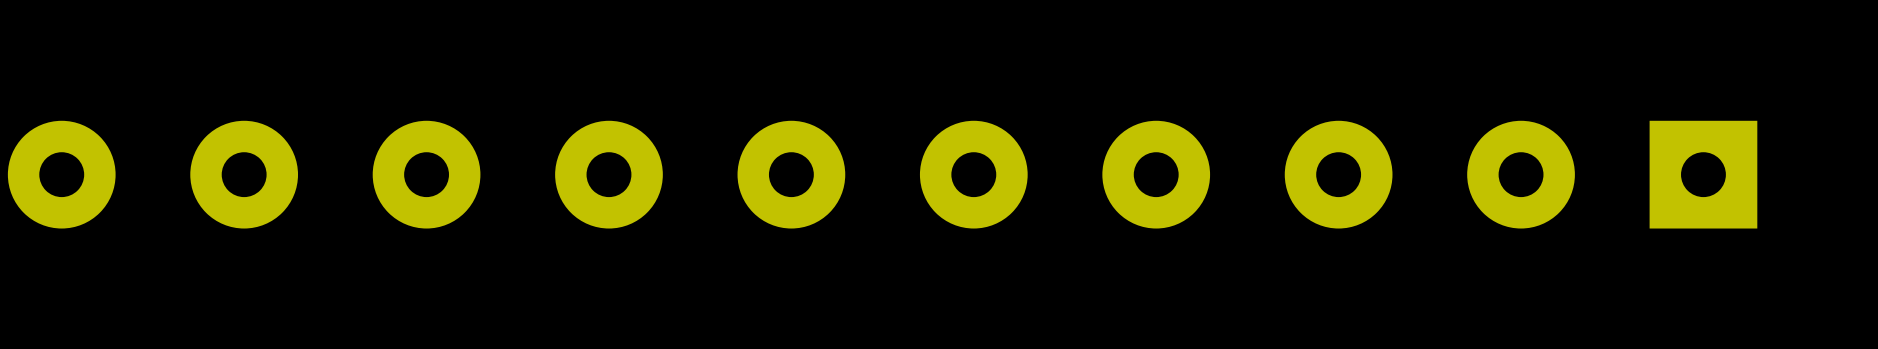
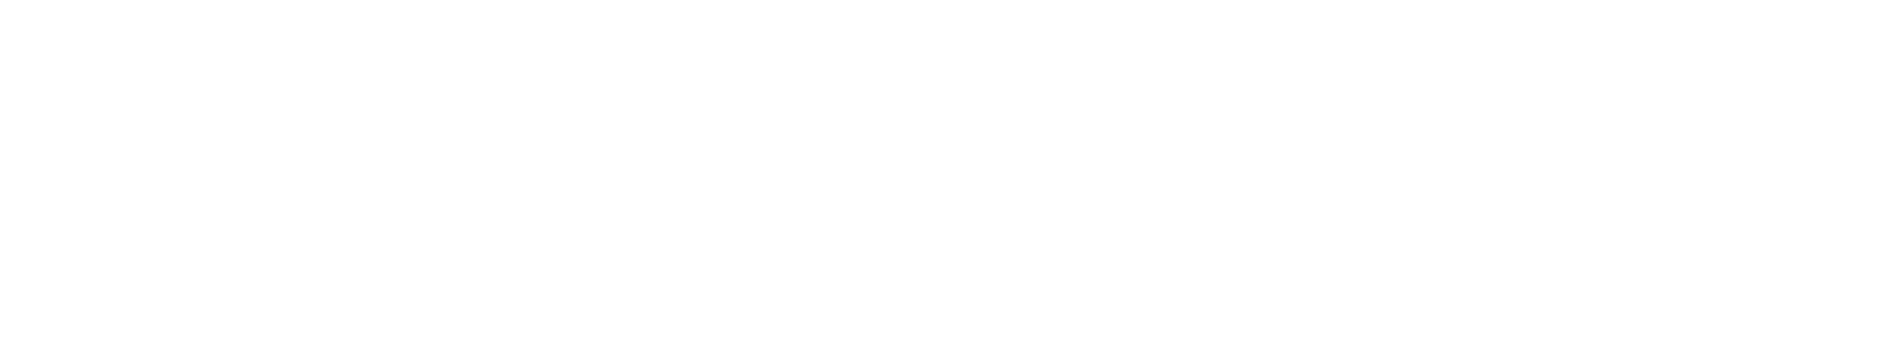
part: (882, 174) -> none

